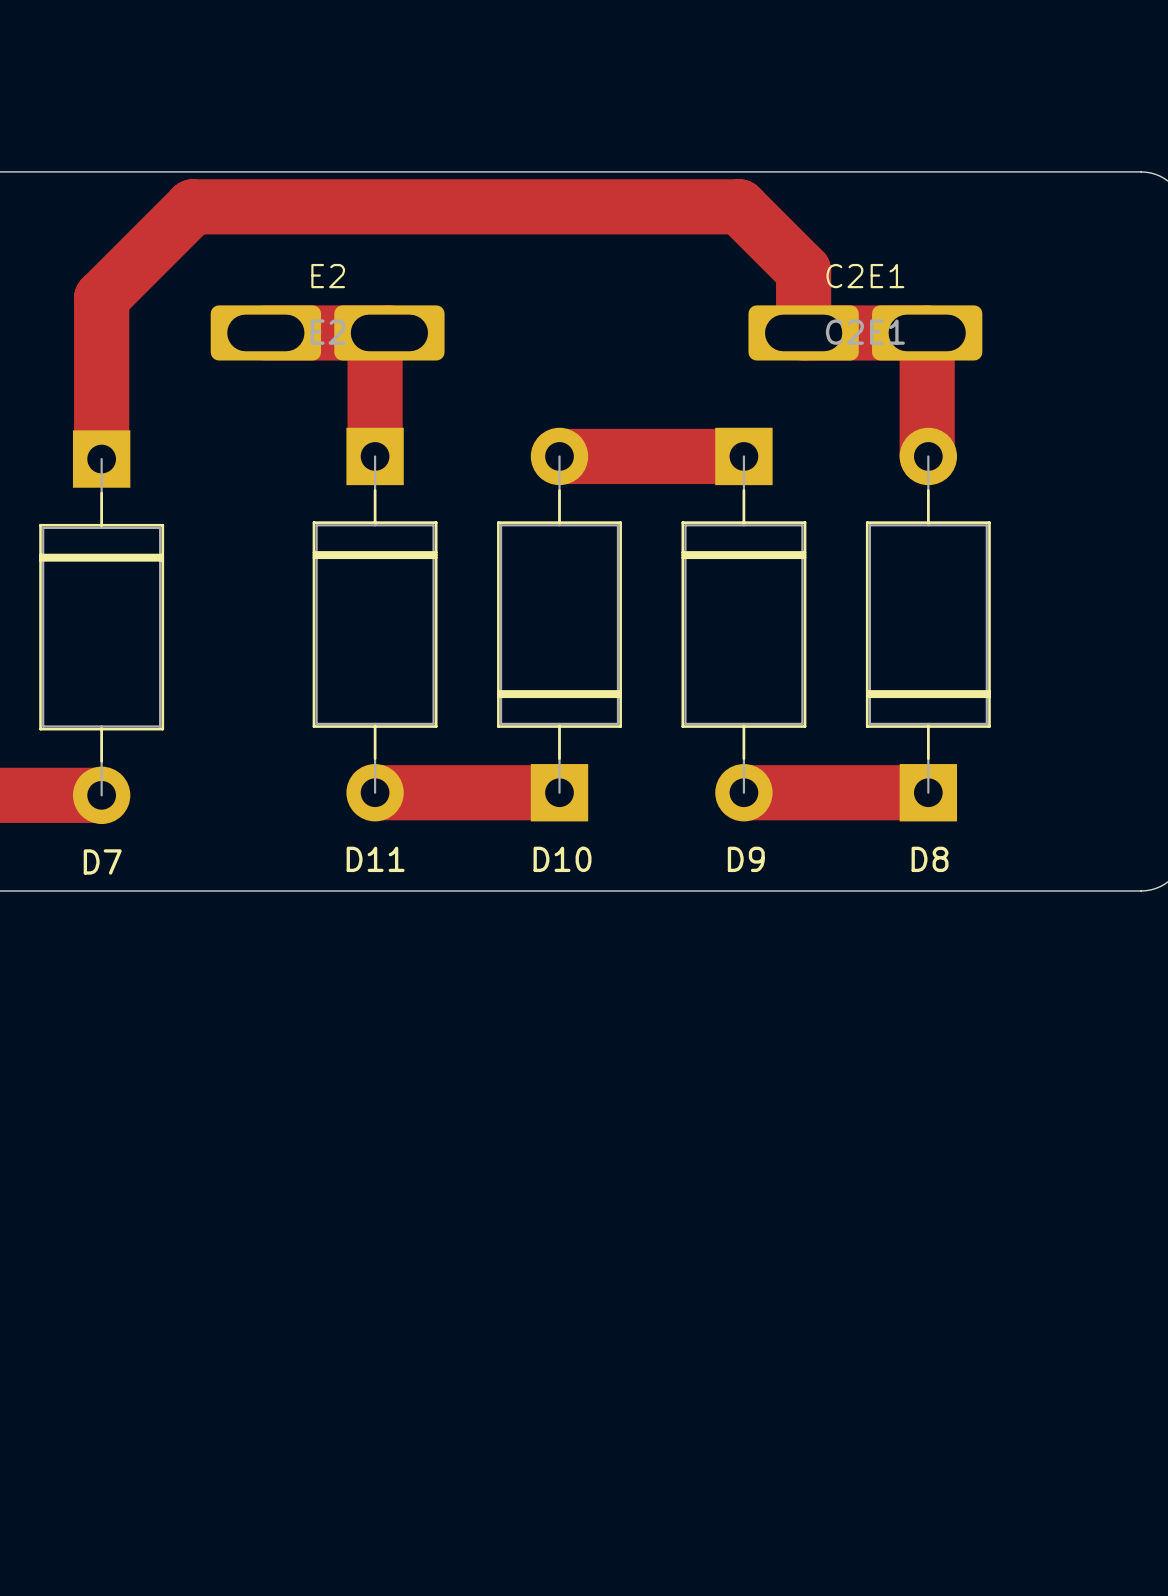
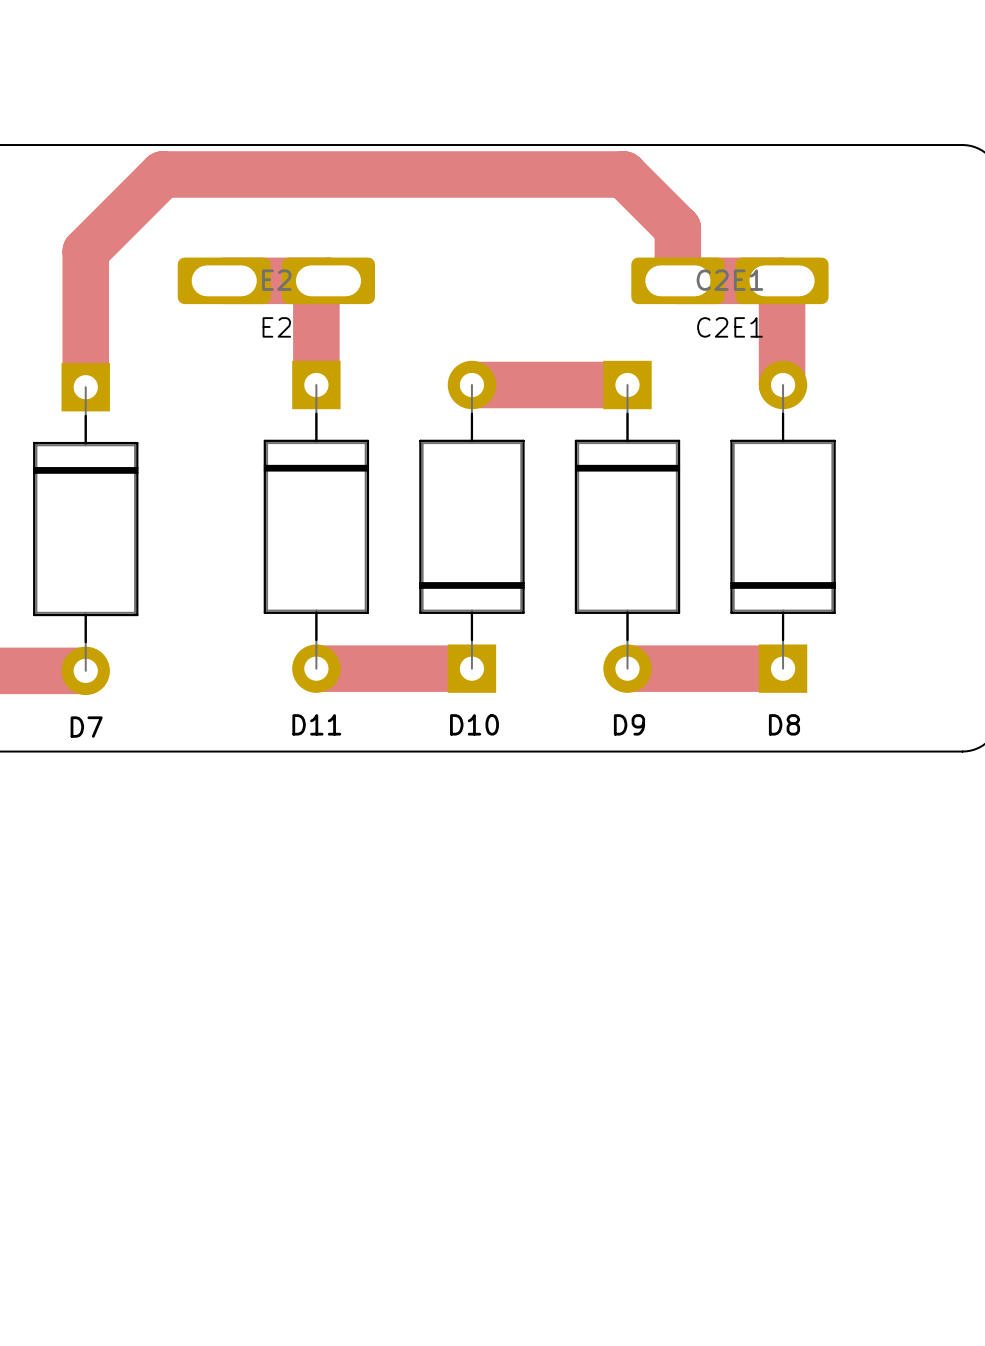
E2 name position: E2 (328, 276) -> E2 (276, 327)
C2E1 name position: C2E1 (865, 276) -> C2E1 (729, 327)

